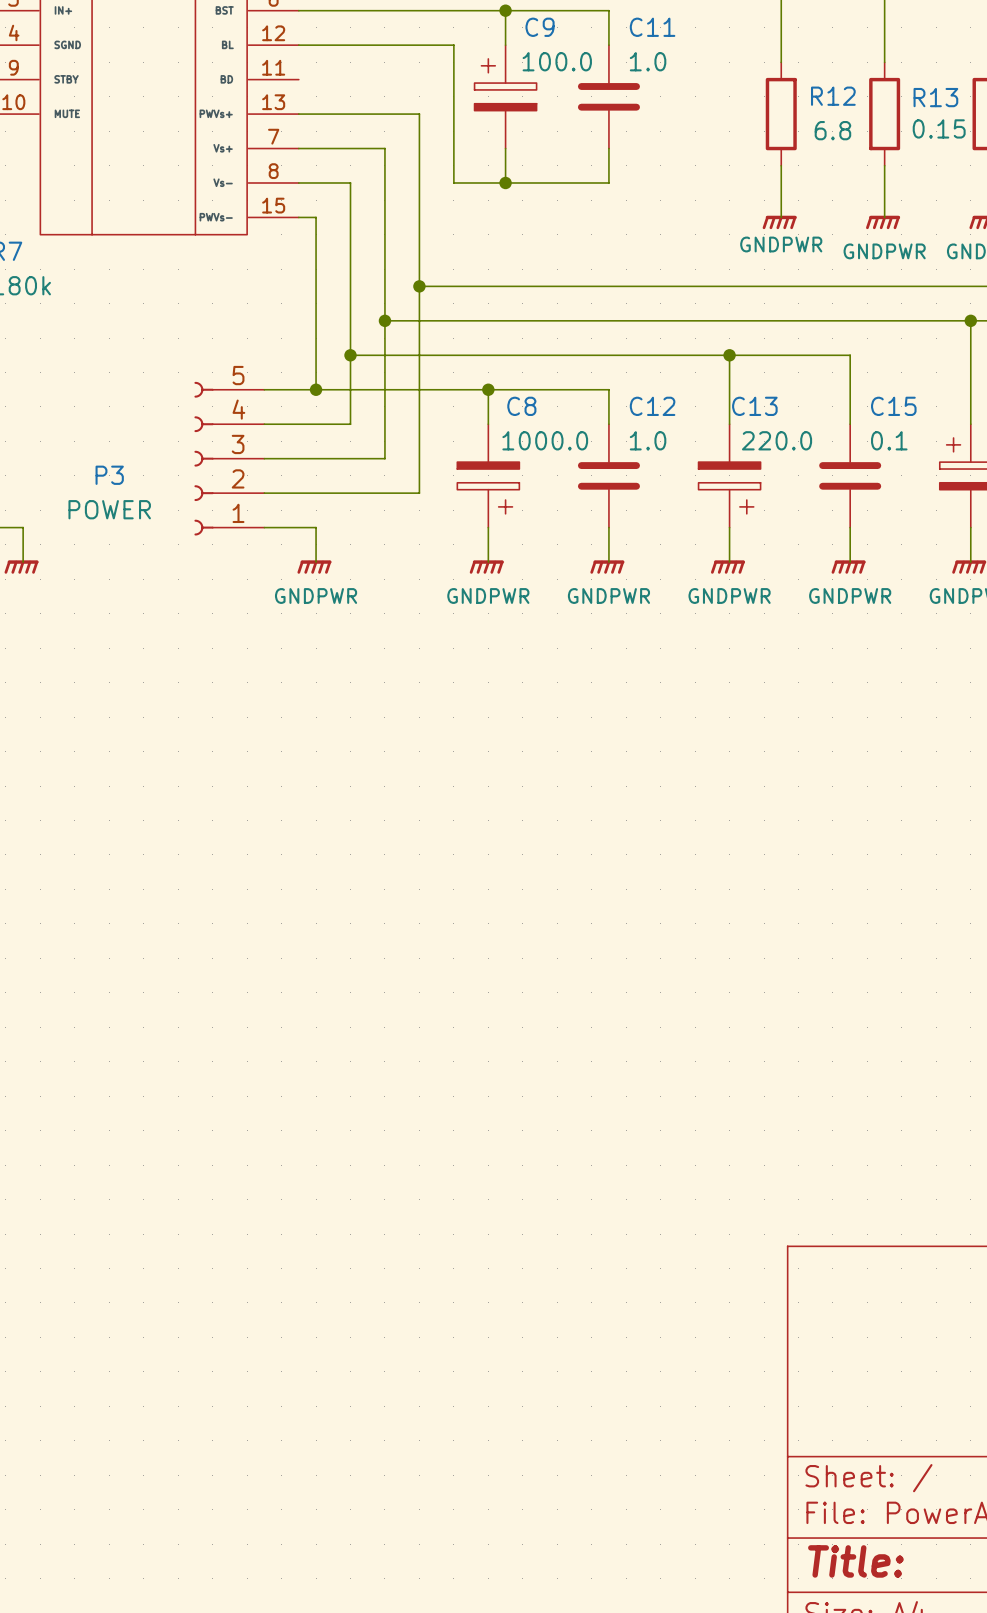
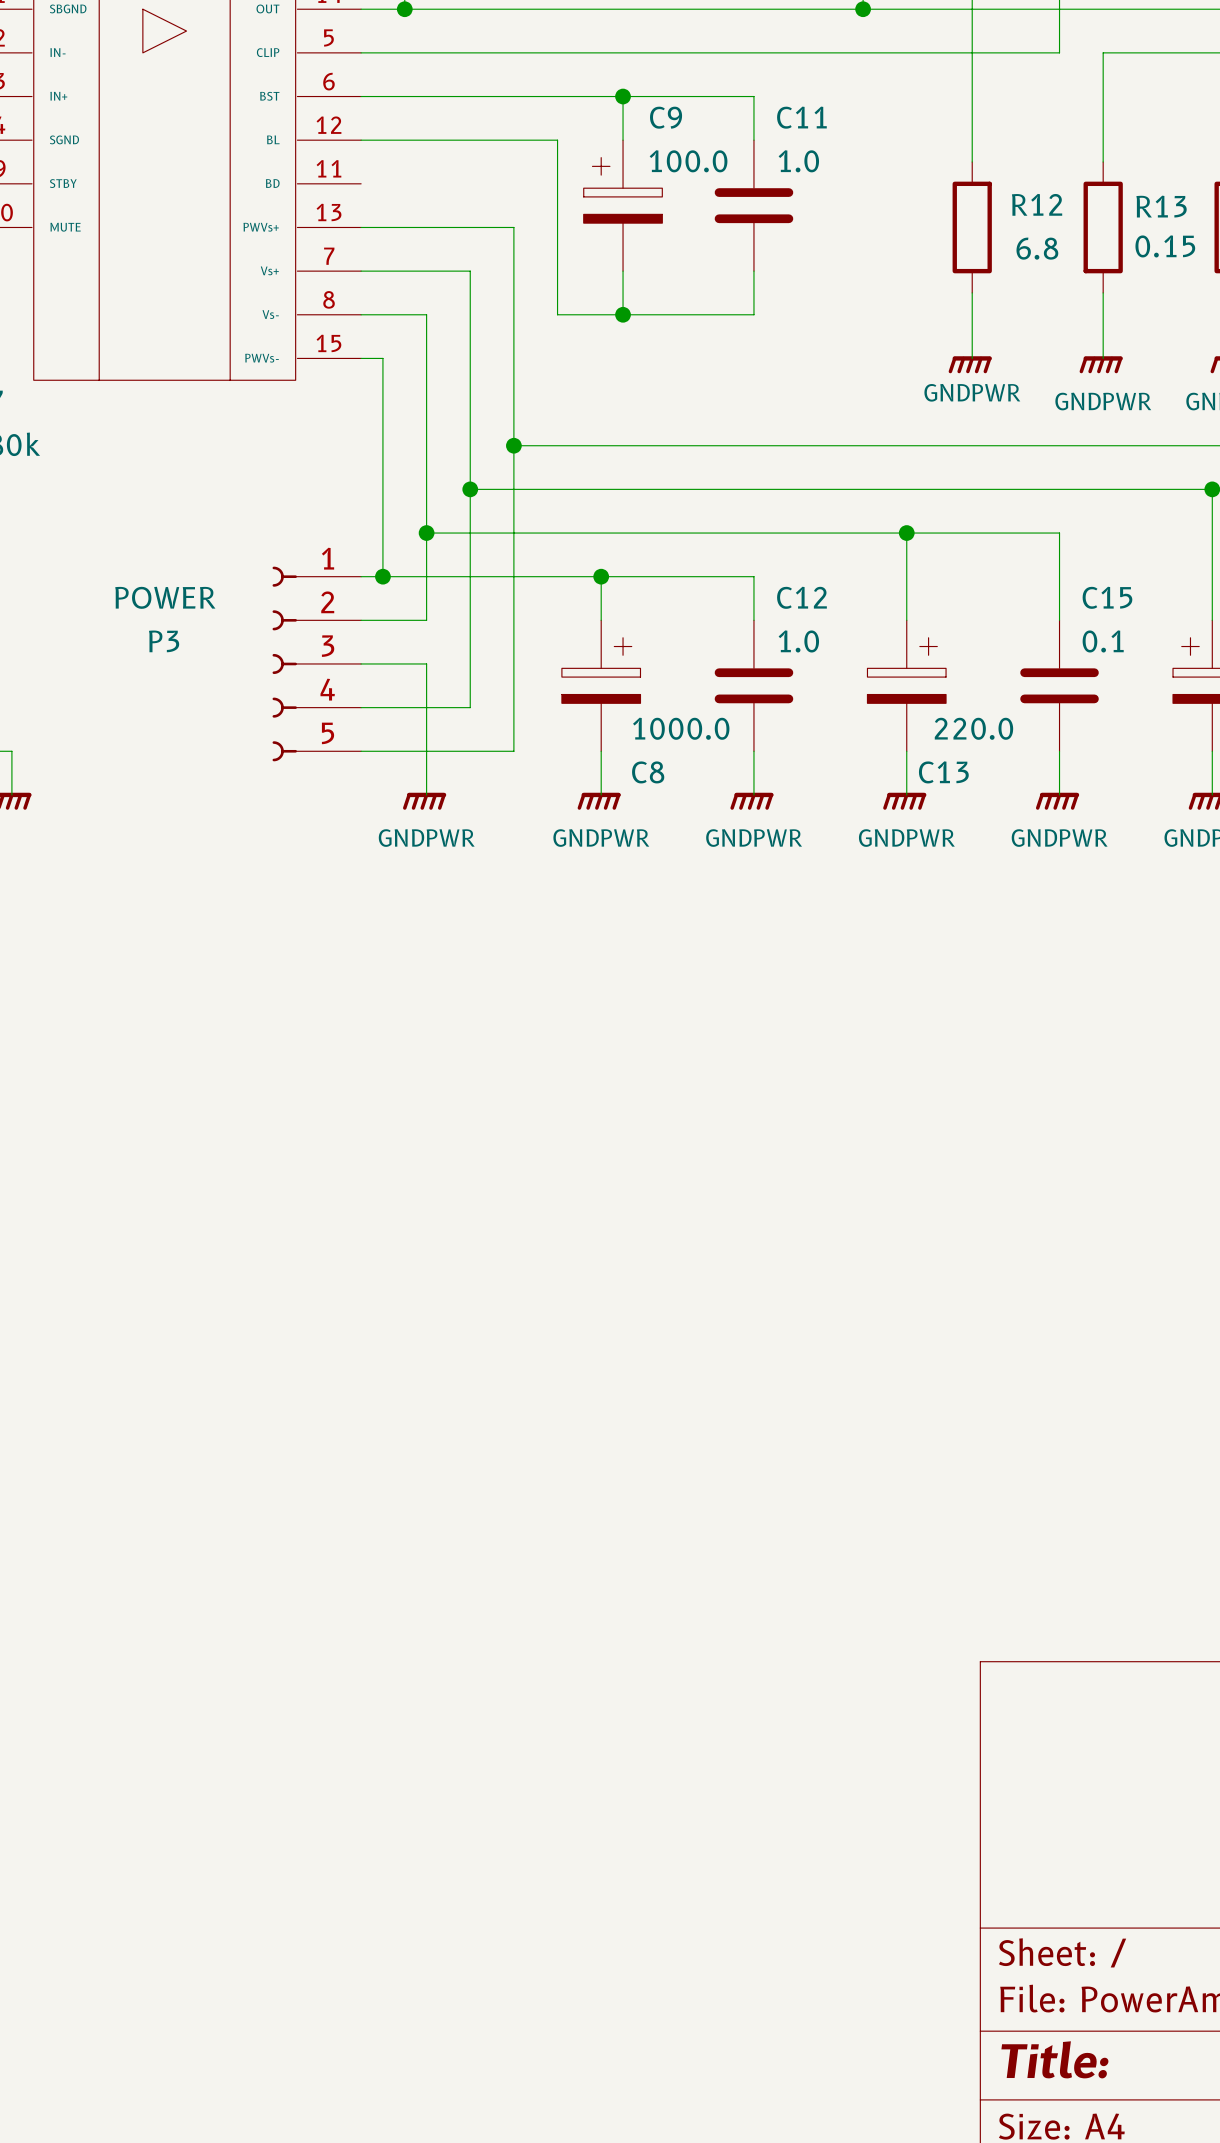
P3 flip: as is (204, 458) -> up-down (284, 663)
wire: (350, 458) (384, 458) -> (470, 707) (470, 663)
wire: none -> (426, 663) (426, 794)
C8 flip: as is (488, 487) -> up-down (601, 670)
C13 flip: as is (729, 487) -> up-down (906, 670)
wire: (384, 493) (419, 493) -> (382, 751) (513, 751) (513, 707)
wire: (316, 527) (316, 562) -> none
power symbol position: GNDPWR (314, 567) -> GNDPWR (424, 801)

